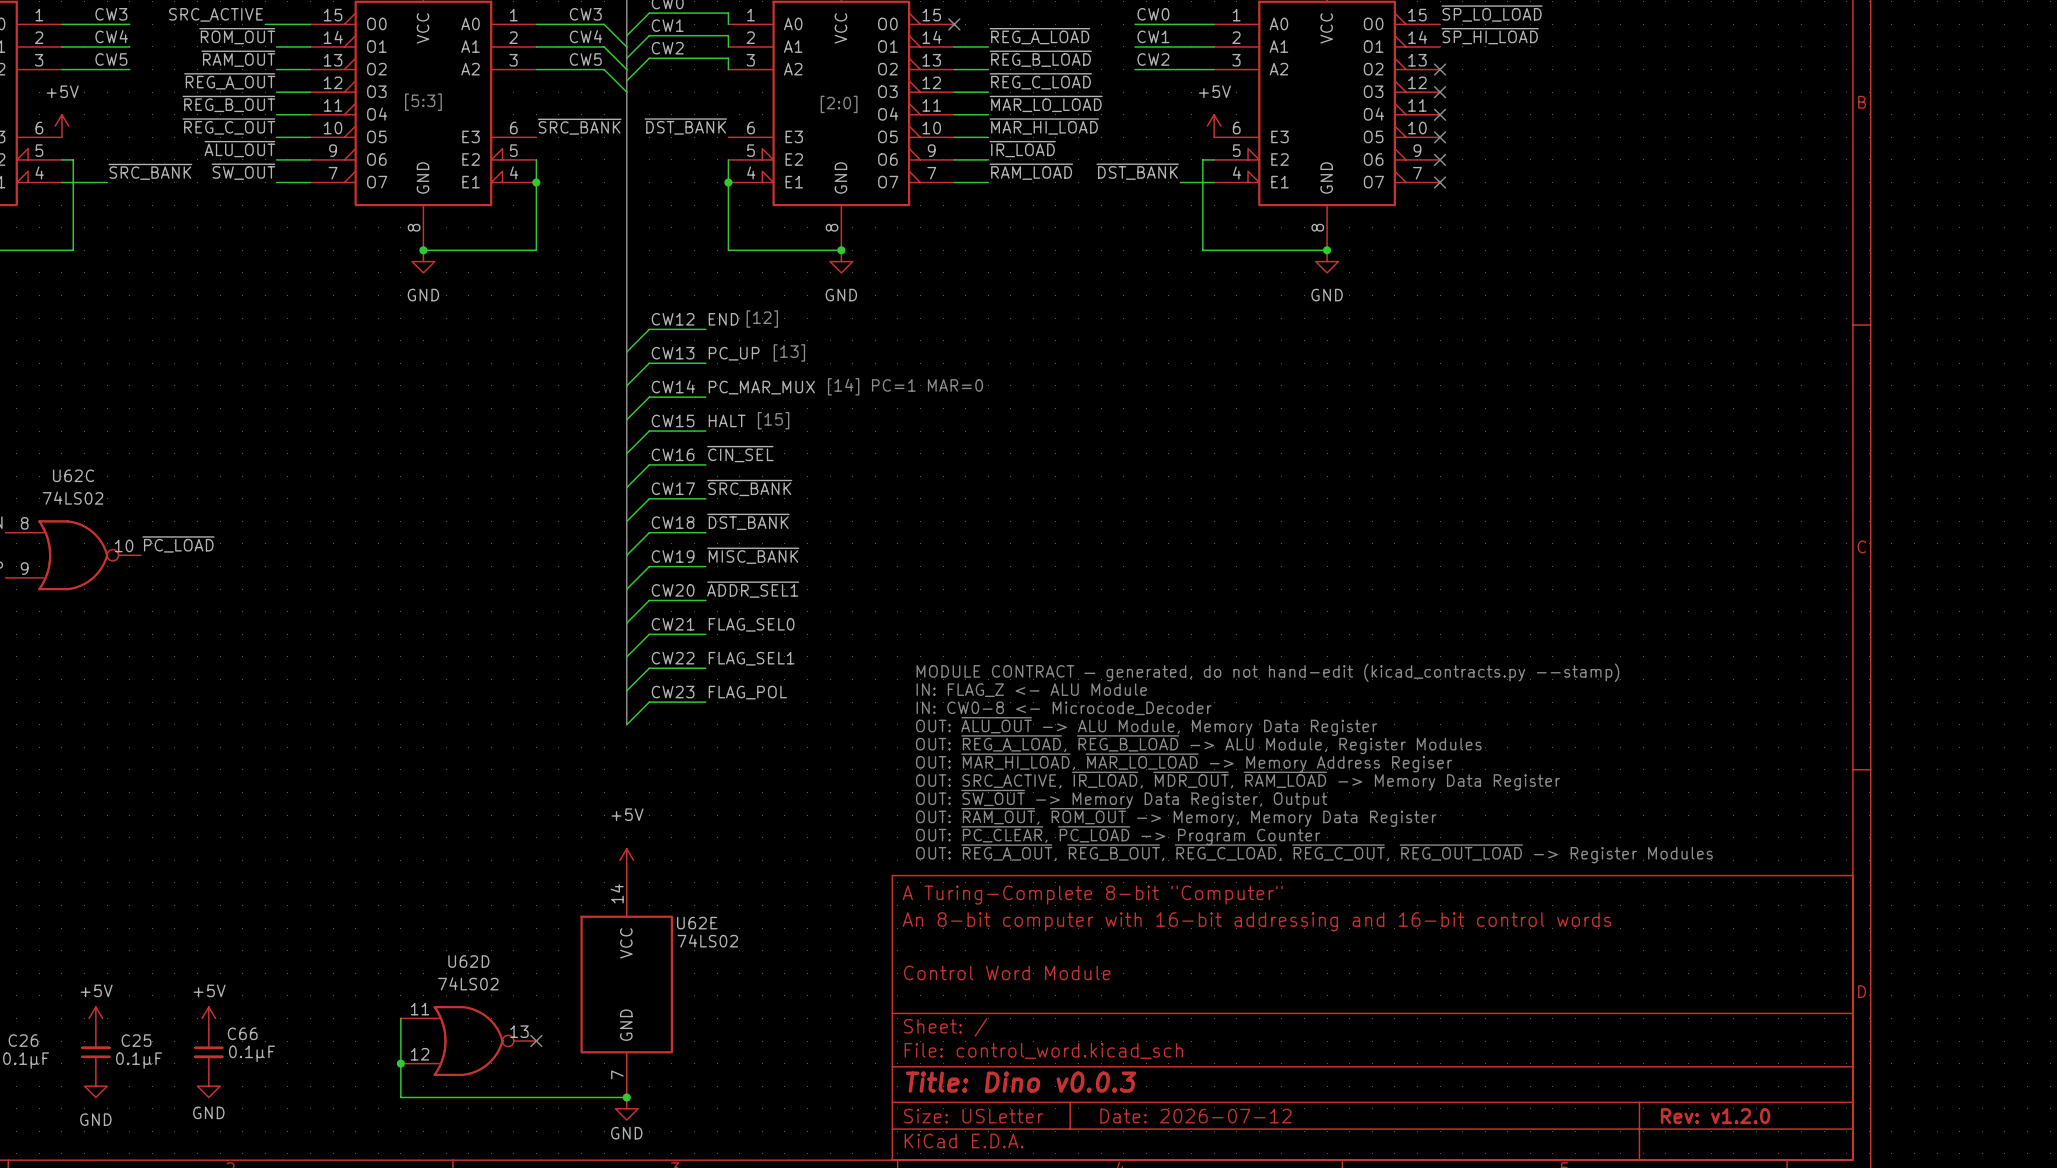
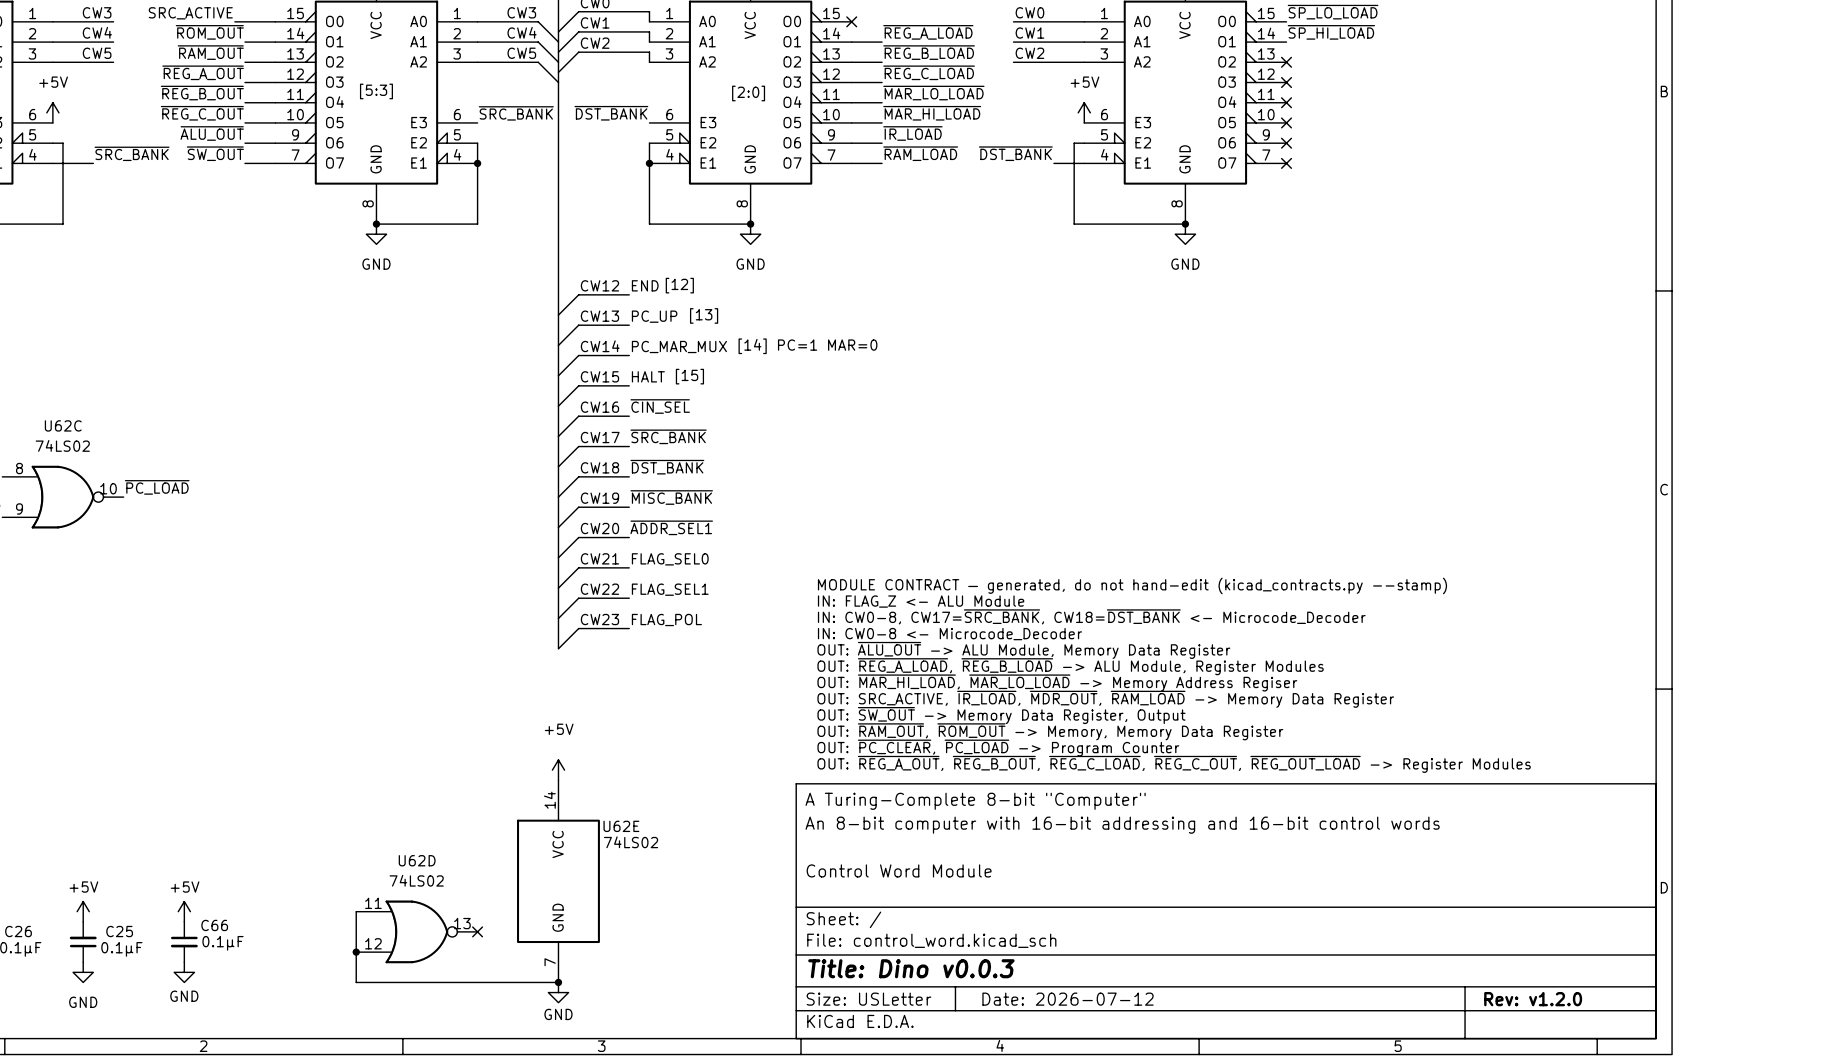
text: none -> MODULE CONTRACT — generated, do not hand-edit (kicad_contracts.py --stamp) (1132, 585)
text: MODULE CONTRACT — generated, do not hand-edit (kicad_contracts.py --stamp) (1267, 672) -> IN: FLAG_Z <- ALU Module (921, 601)
text: IN: FLAG_Z <- ALU Module (1031, 690) -> IN: CW0-8, CW17=~{SRC_BANK}, CW18=~{DST_BANK} <- Microcode_Decoder (1091, 616)

